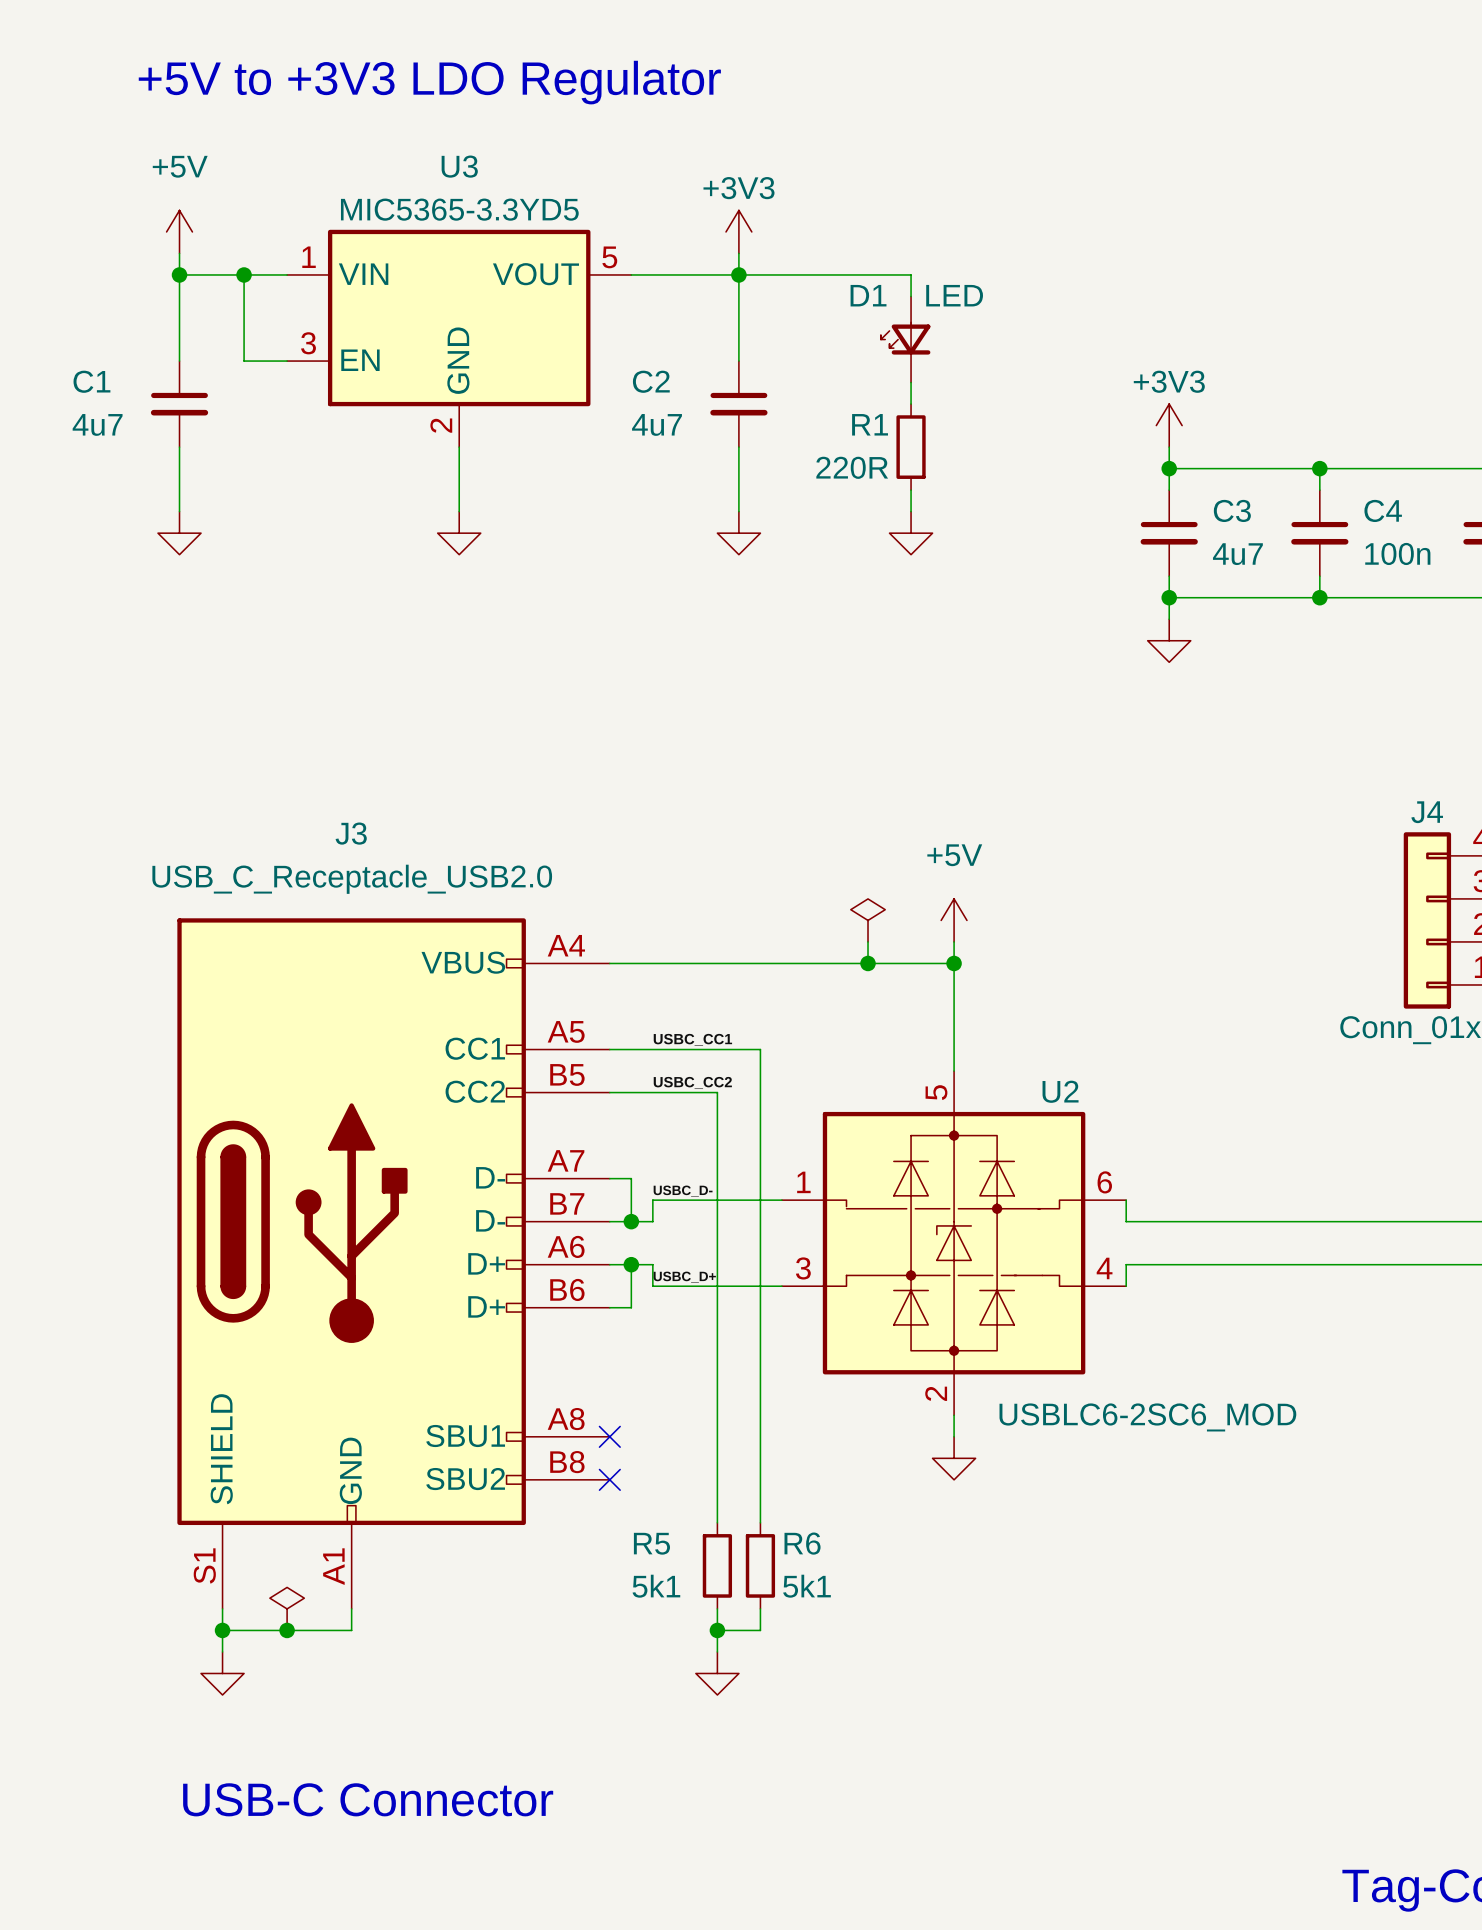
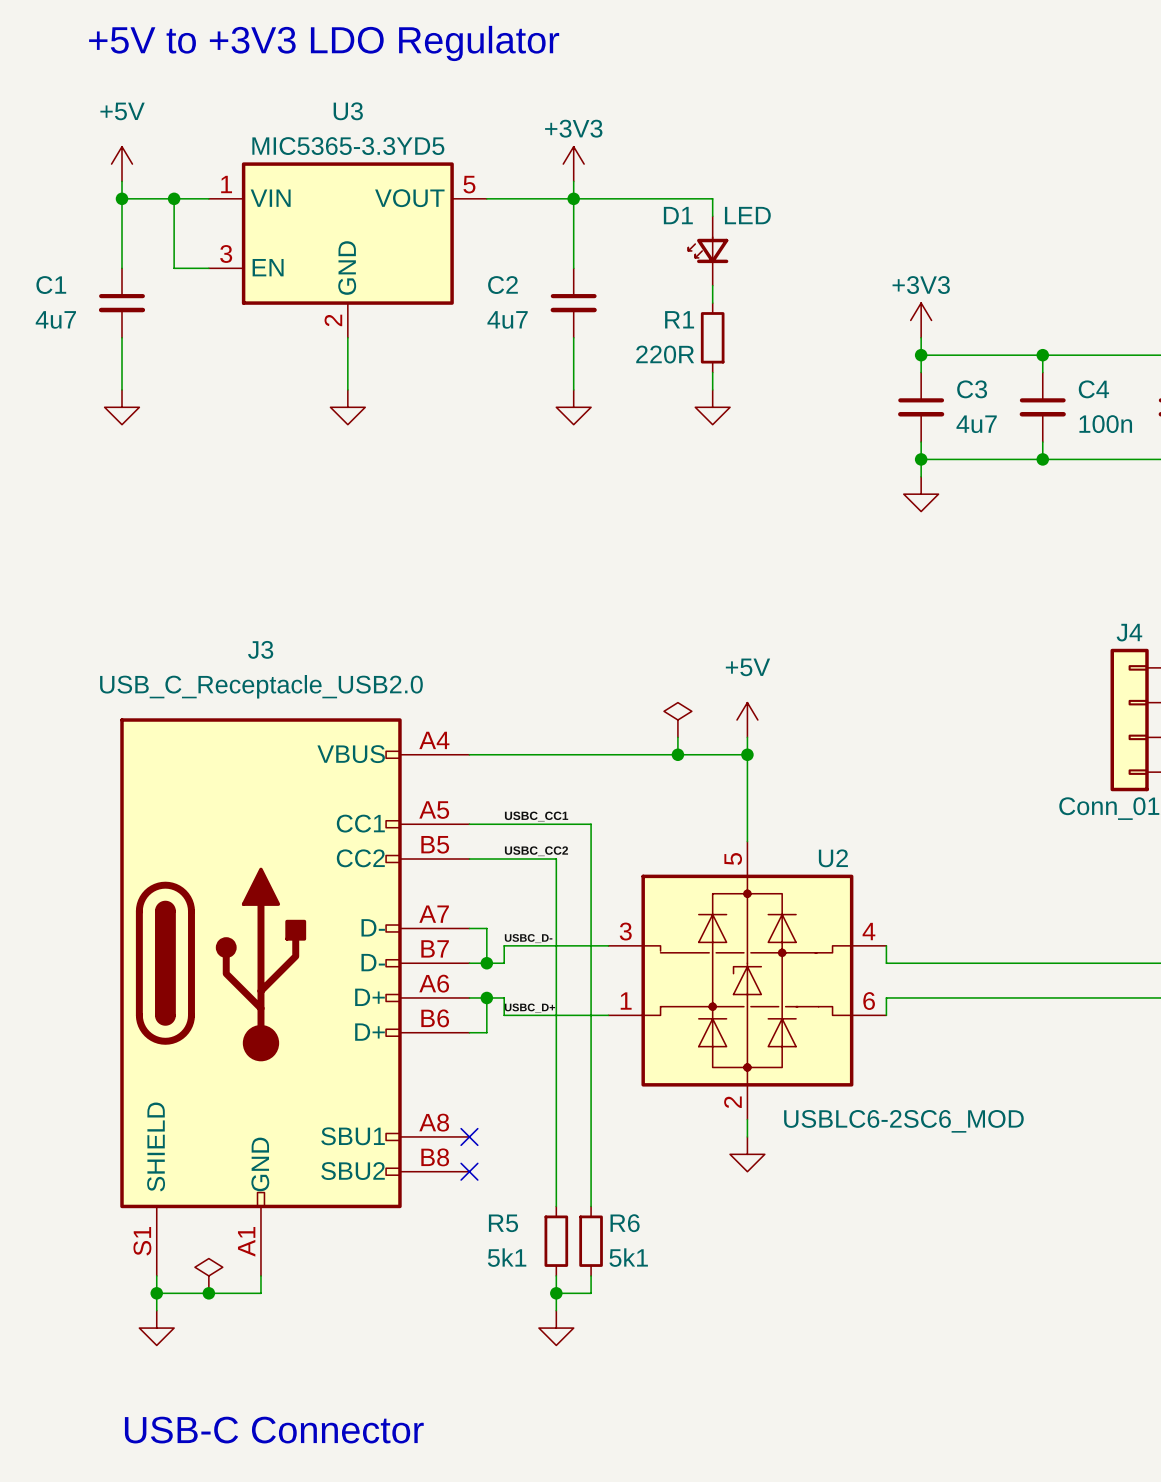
U2 pin number: 1 (803, 1182) -> 3 (625, 931)
U2 pin number: 6 (1104, 1182) -> 4 (868, 931)
U2 pin number: 3 (803, 1268) -> 1 (626, 1001)
U2 pin number: 4 (1104, 1268) -> 6 (869, 1001)

